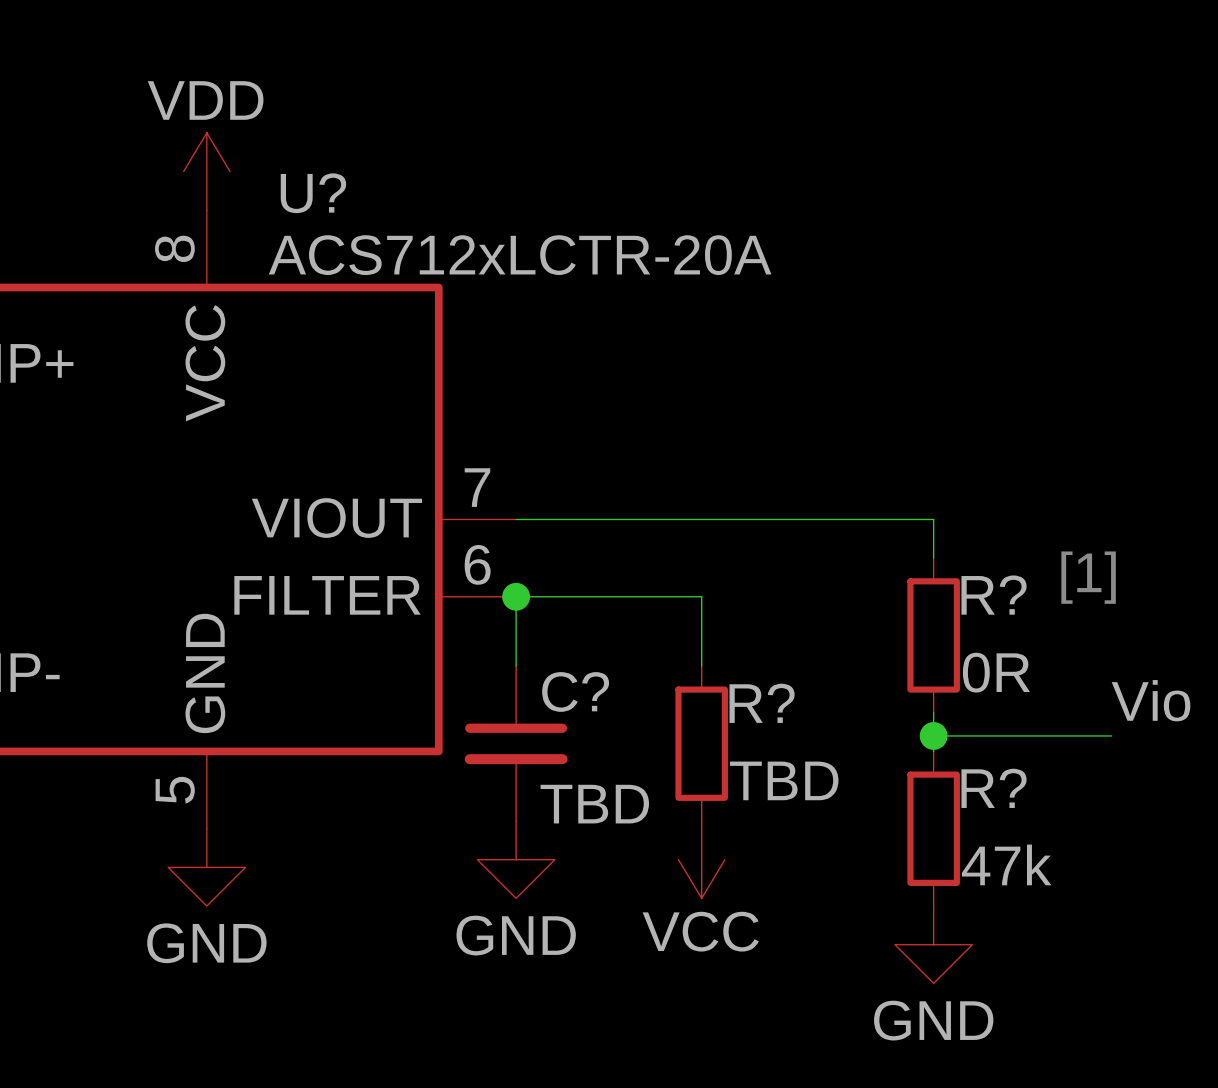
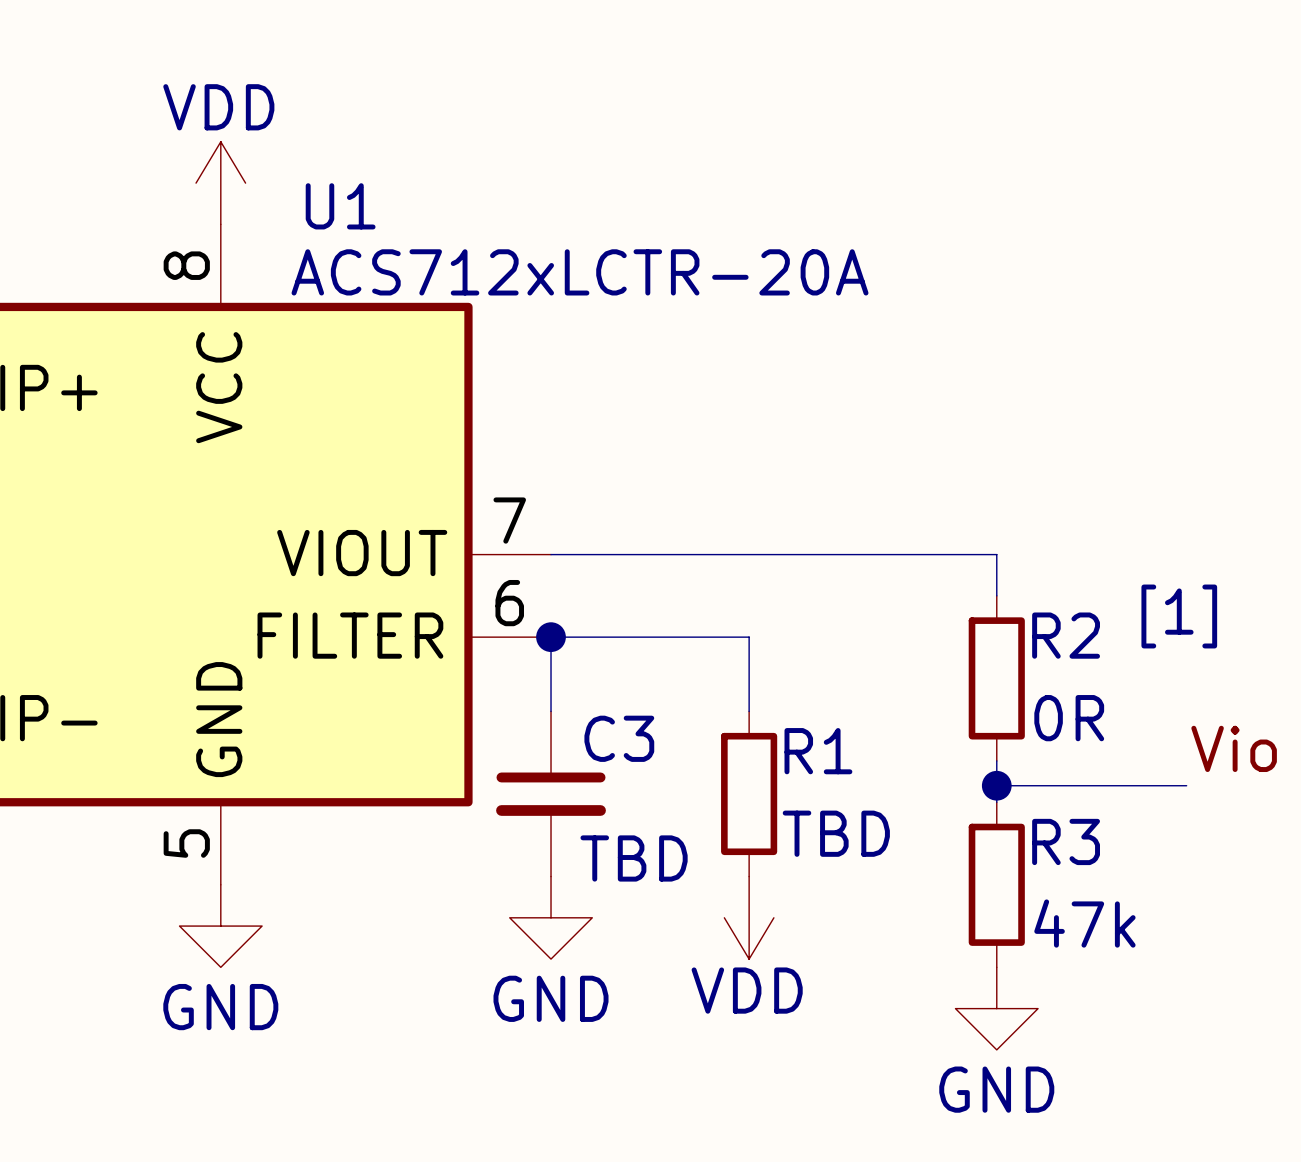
U? name: U? (313, 193) -> U1 (340, 206)
R? name: R? (994, 595) -> R2 (1066, 635)
C? name: C? (575, 691) -> C3 (619, 738)
R? name: R? (762, 703) -> R1 (818, 751)
R? name: R? (994, 788) -> R3 (1066, 841)
power symbol: VCC (701, 859) -> VDD (749, 917)

